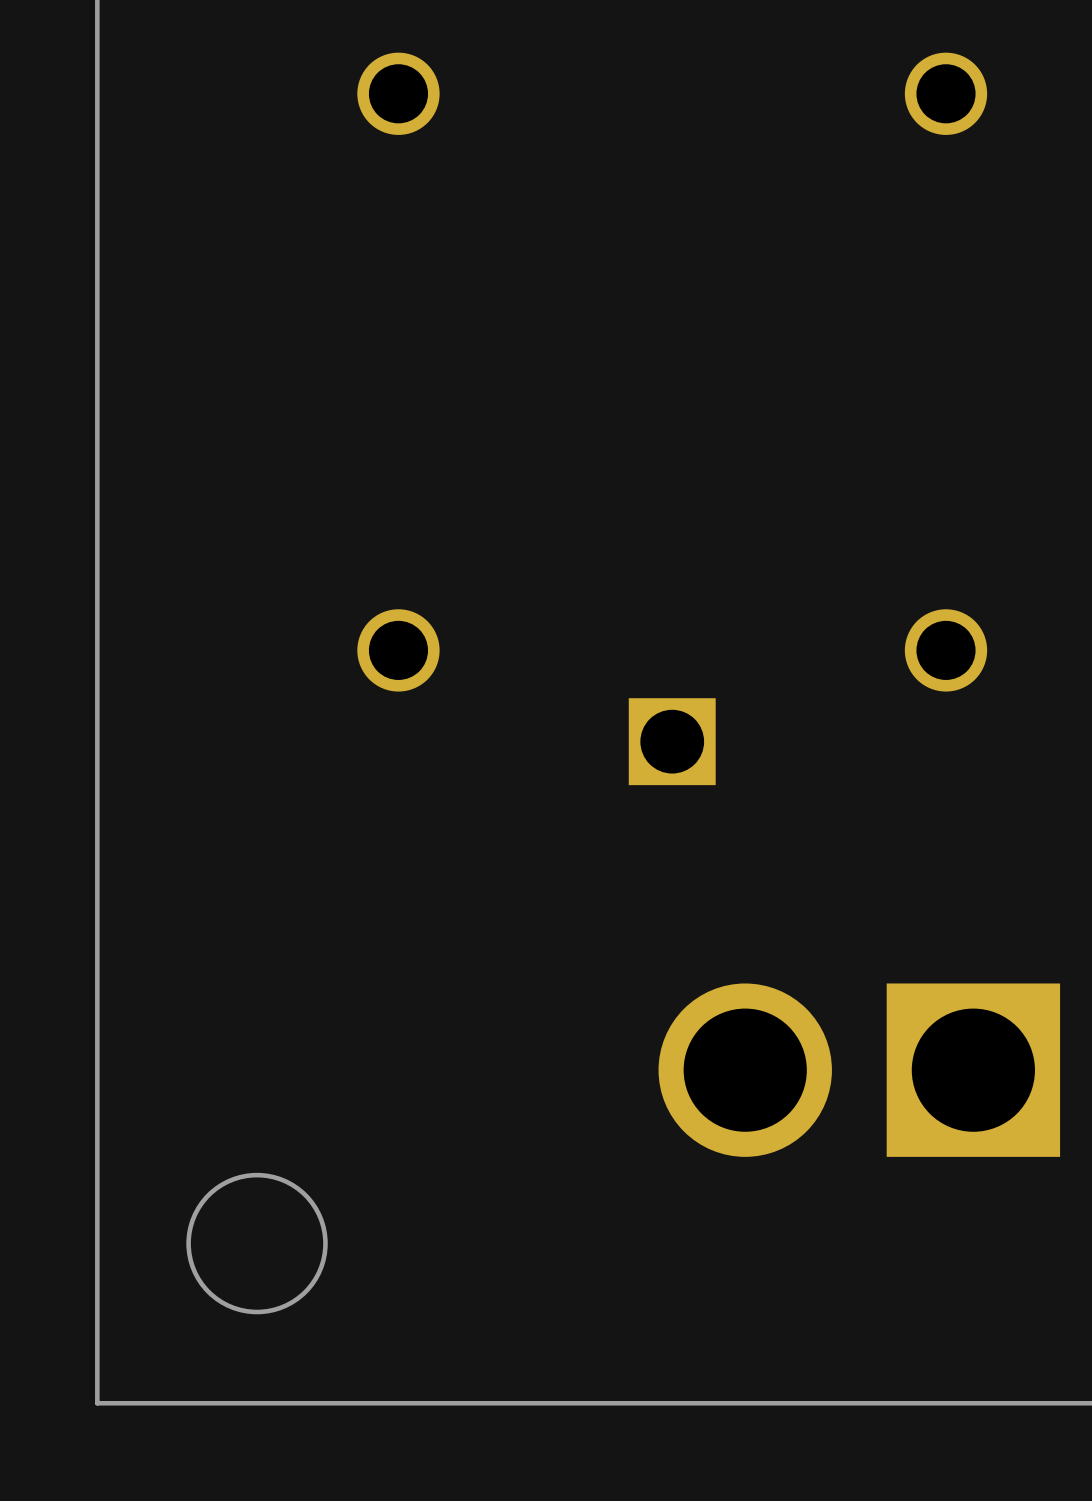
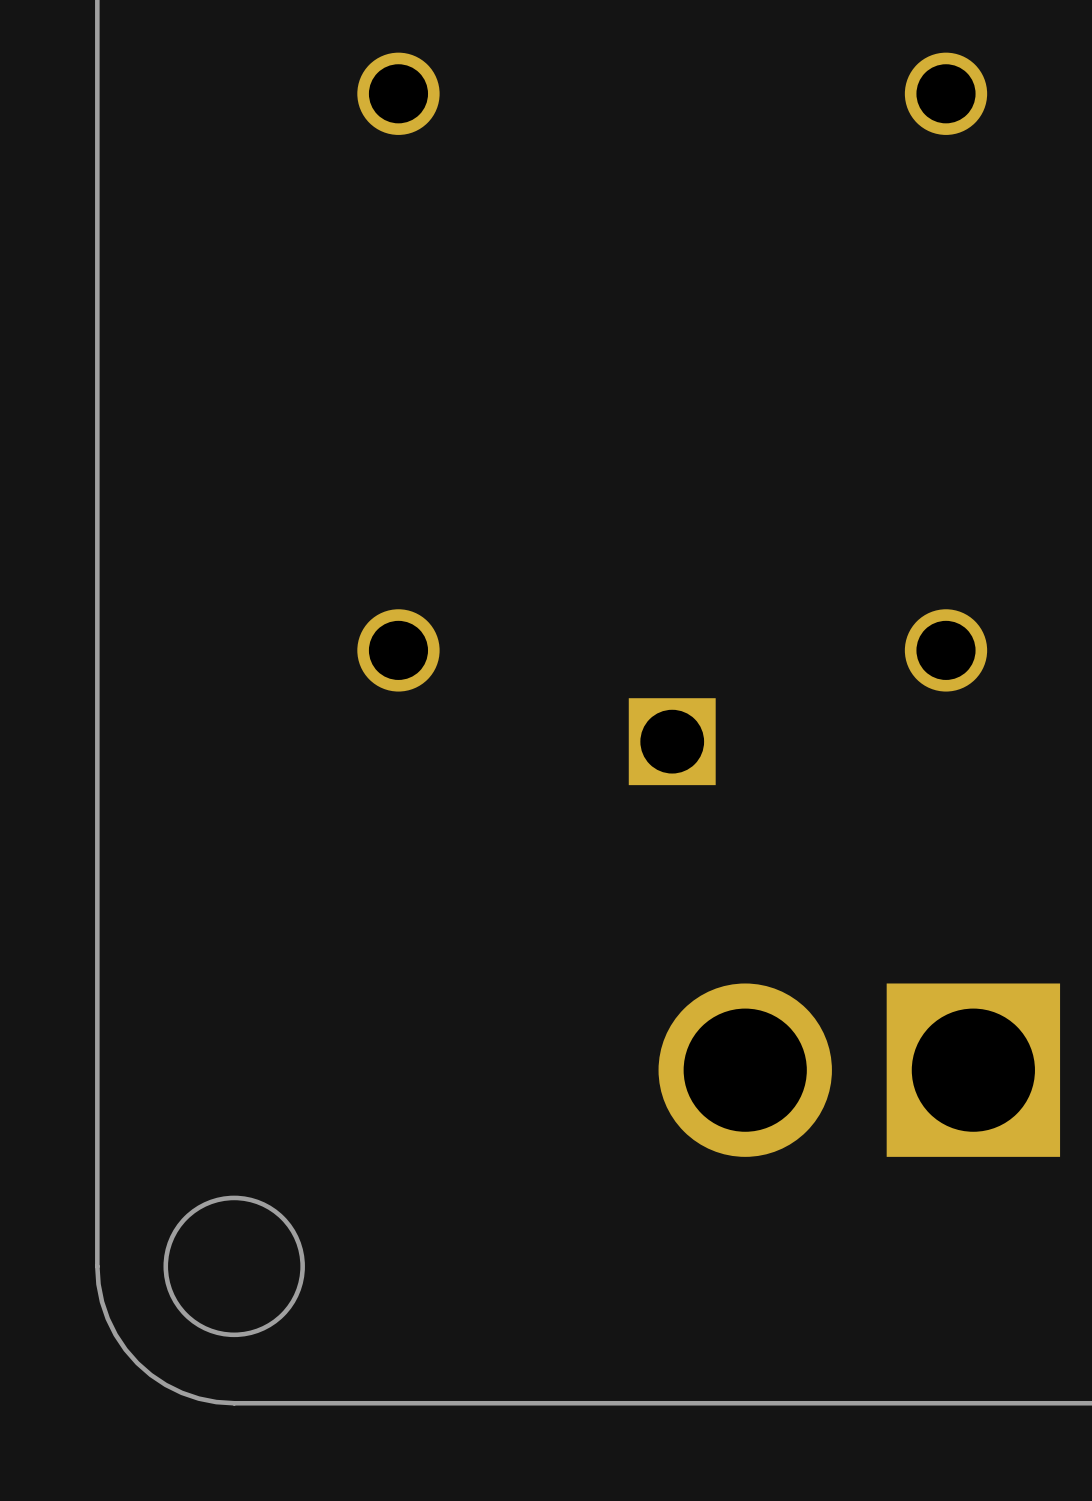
round board edge position: (257, 1243) -> (234, 1266)
board edge: (97, 1266) (97, 1403) (234, 1403) -> (97, 1266) (98, 1284) (107, 1318) (115, 1334) (137, 1363) (165, 1384) (181, 1392) (198, 1398) (234, 1403)

